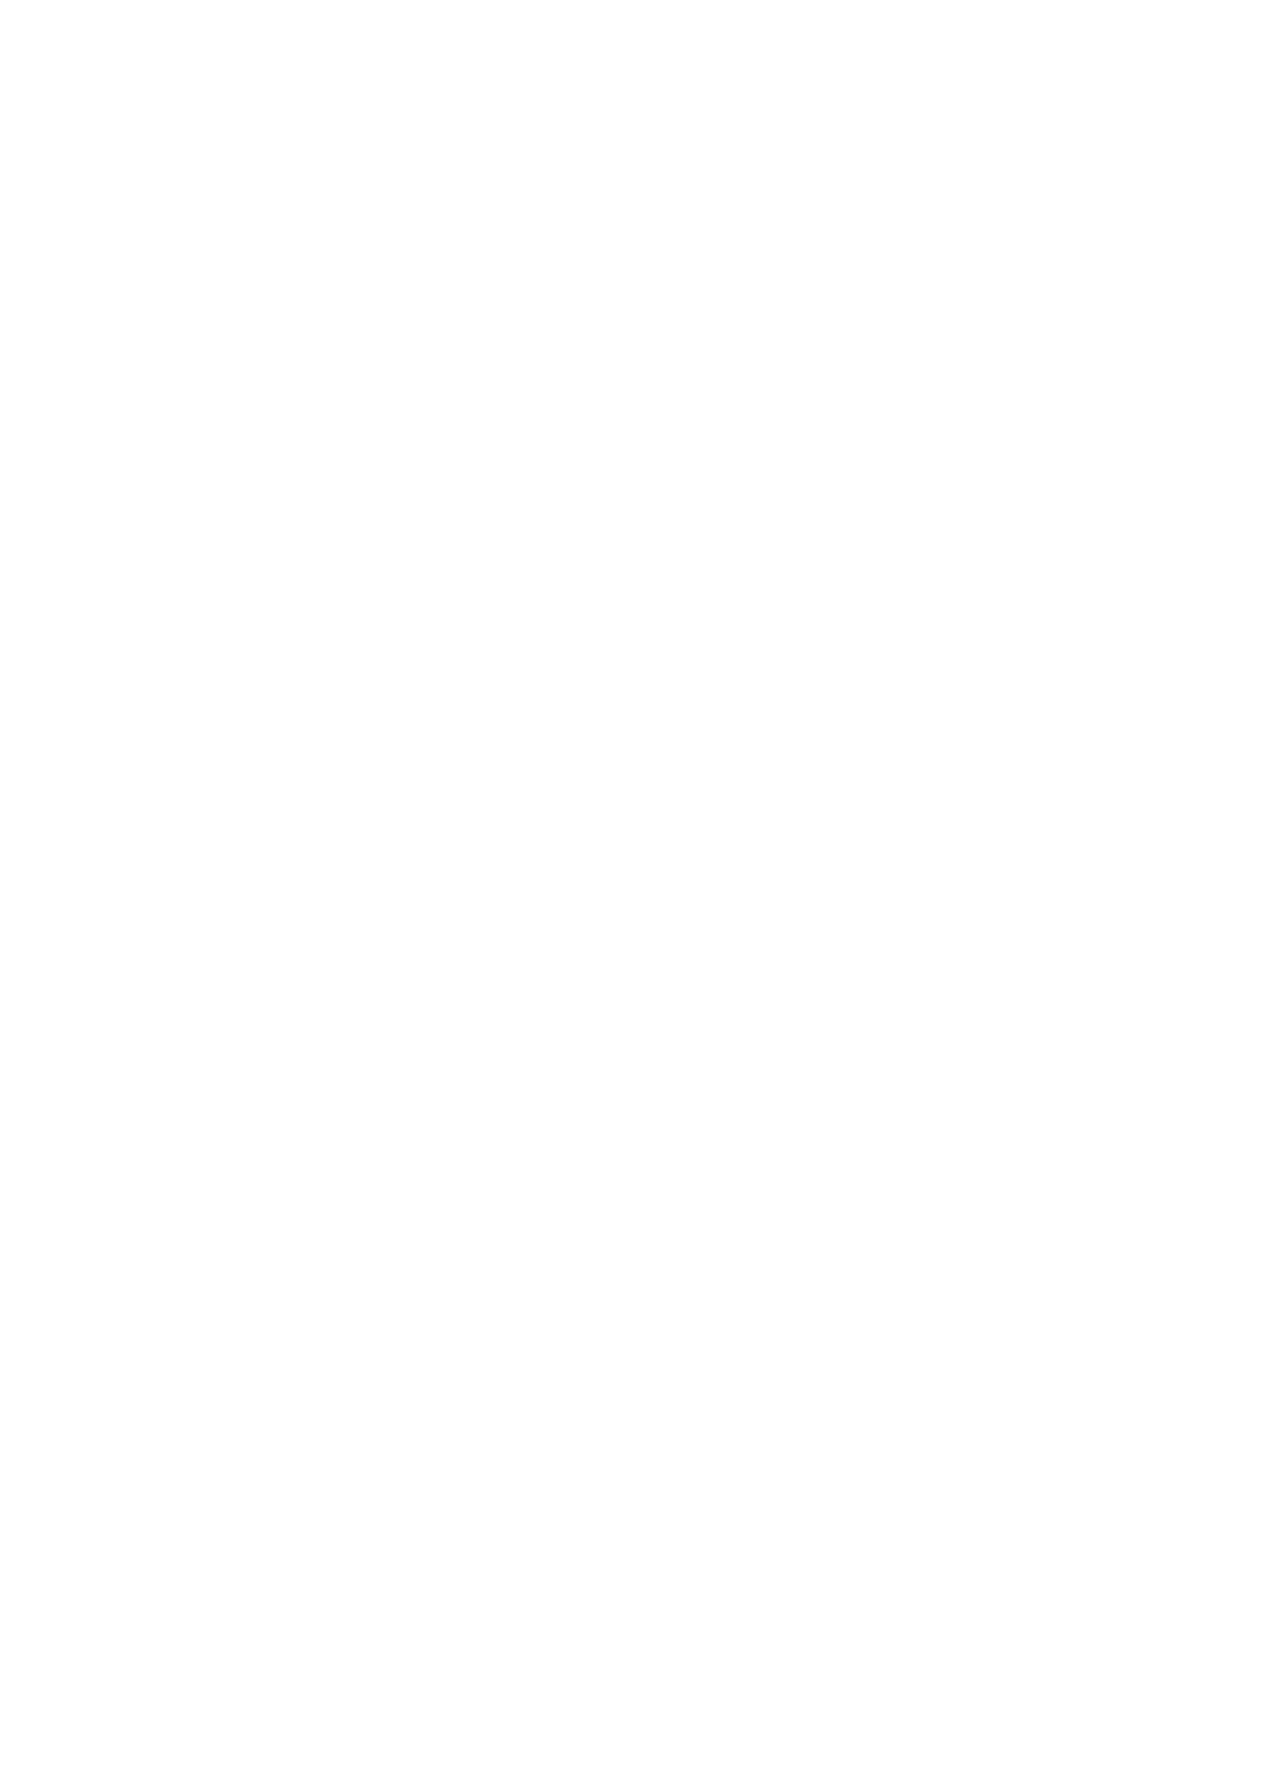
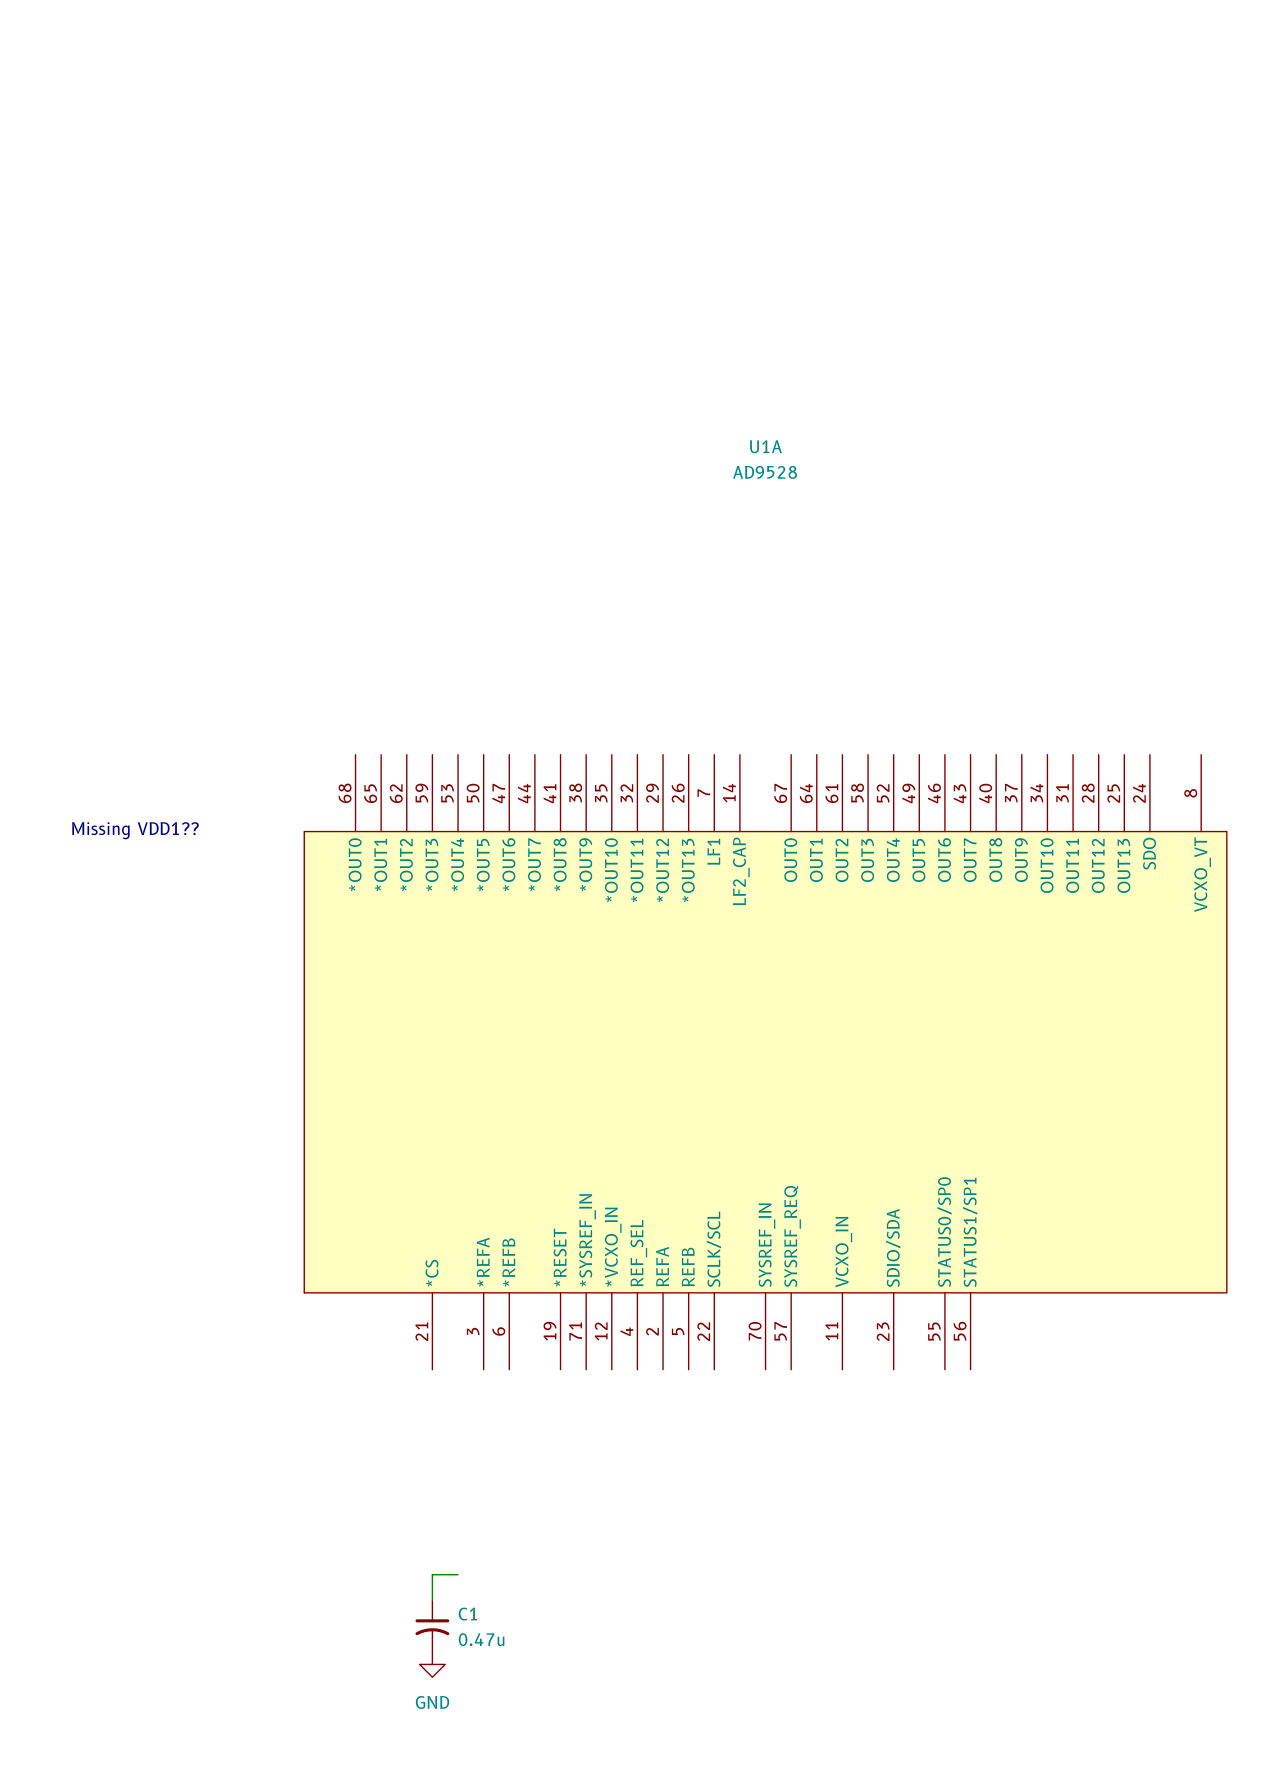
text: none -> Missing VDD1?? (135, 830)
U1A: none -> AD9528 (765, 1062)
wire: none -> (458, 1574) (432, 1574) (432, 1600)
C1: none -> 0.47u (432, 1625)
power symbol: none -> GND (432, 1664)

